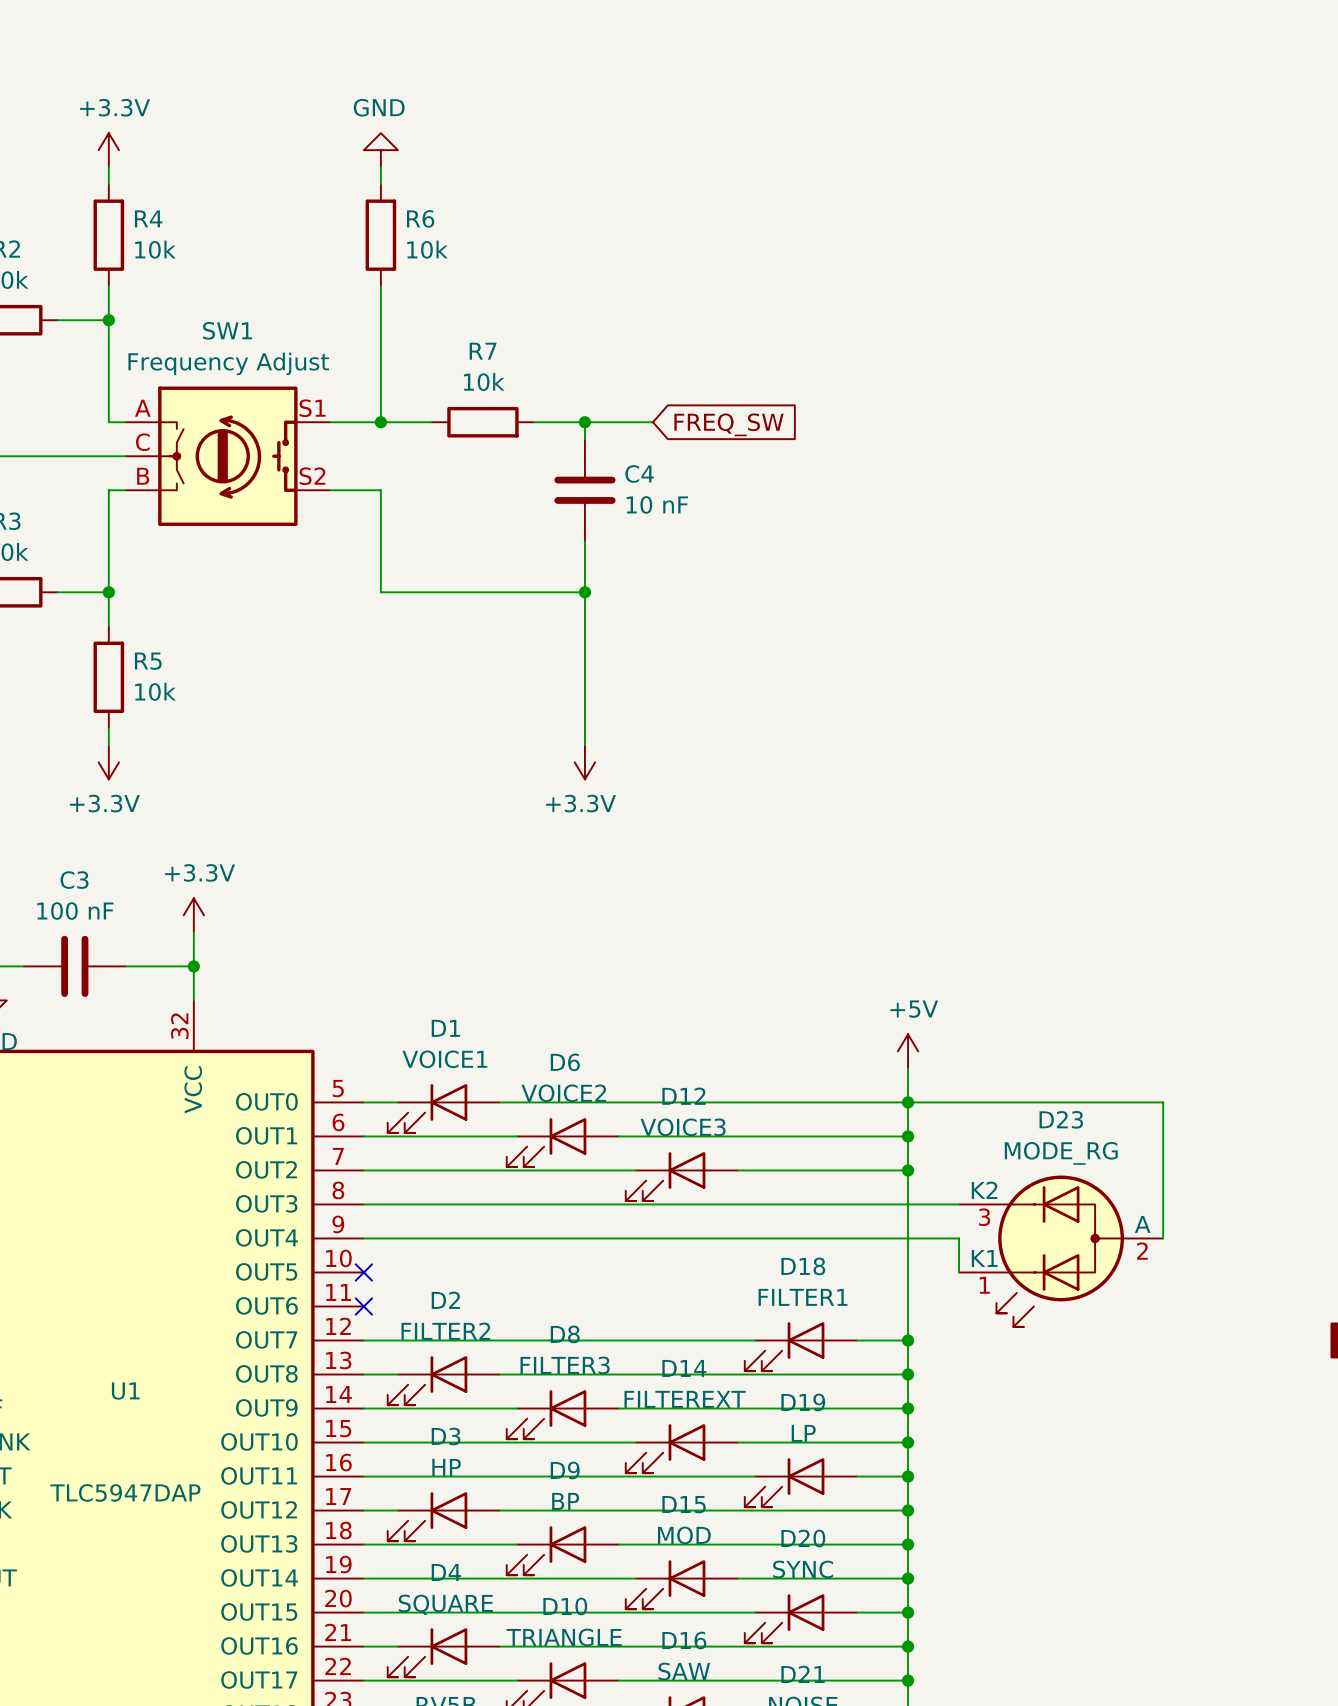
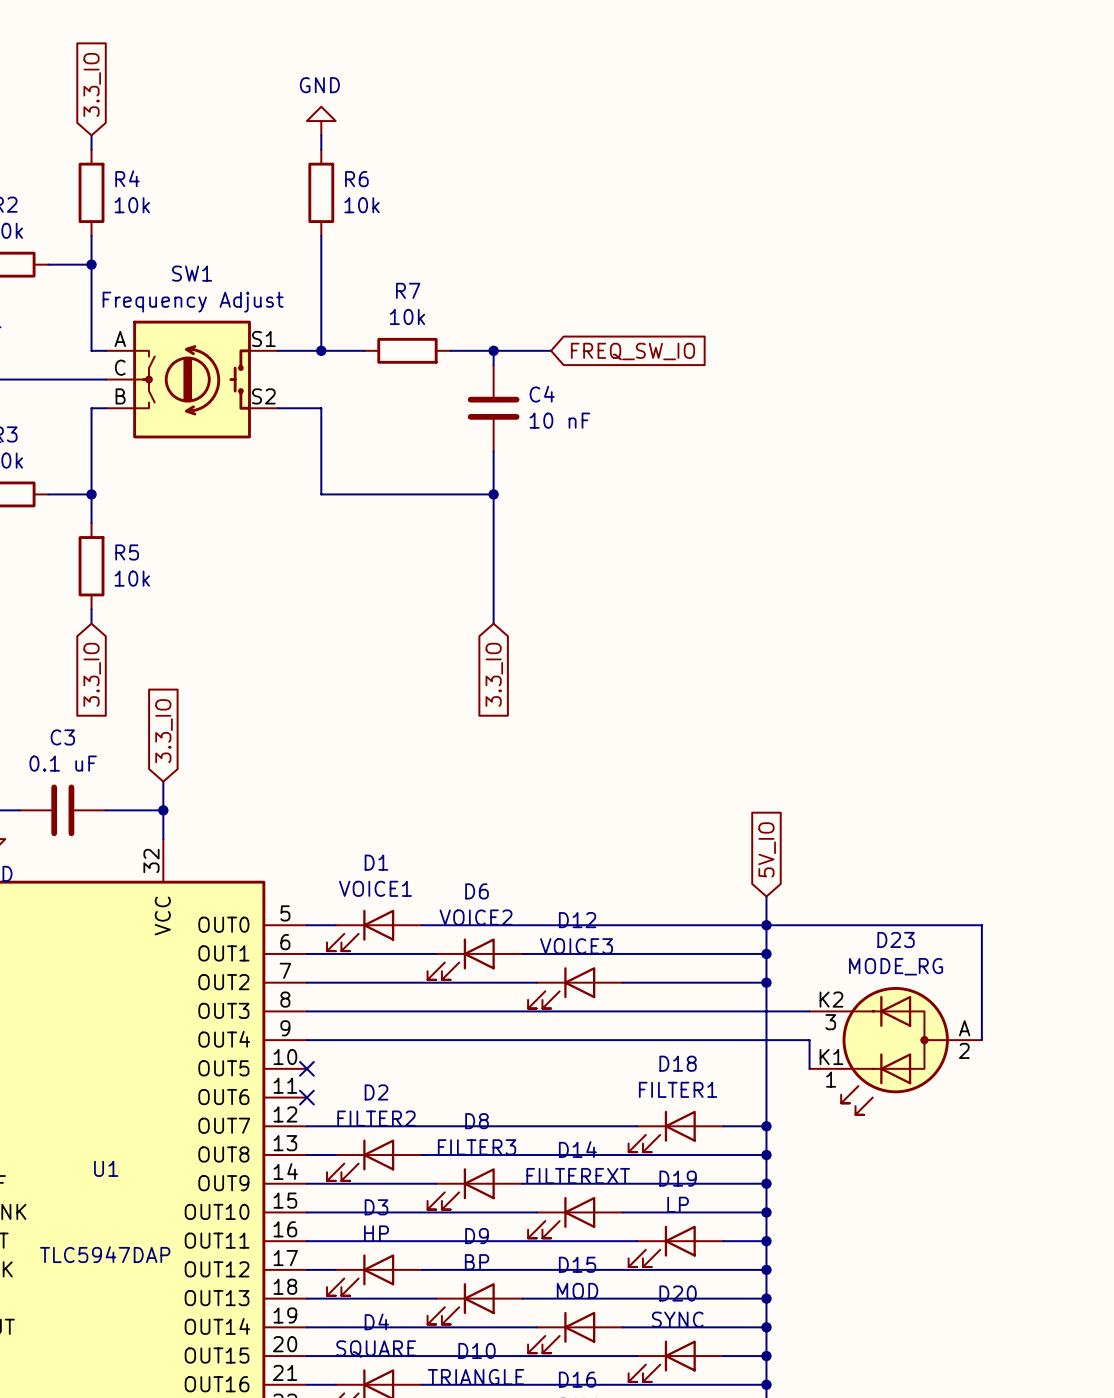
global label: none -> 3.3_IO (92, 84)
power symbol: +3.3V (108, 150) -> none
global label: FREQ_SW (728, 424) -> FREQ_SW_IO (632, 351)
power symbol: +3.3V (108, 762) -> none
power symbol: +3.3V (584, 762) -> none
global label: none -> 3.3_IO (92, 674)
global label: none -> 3.3_IO (494, 674)
global label: none -> 3.3_IO (164, 731)
C3 value: 100 nF (75, 911) -> 0.1 uF (63, 763)
power symbol: +3.3V (193, 915) -> none
global label: none -> 5V_IO (767, 849)
power symbol: +5V (908, 1051) -> none

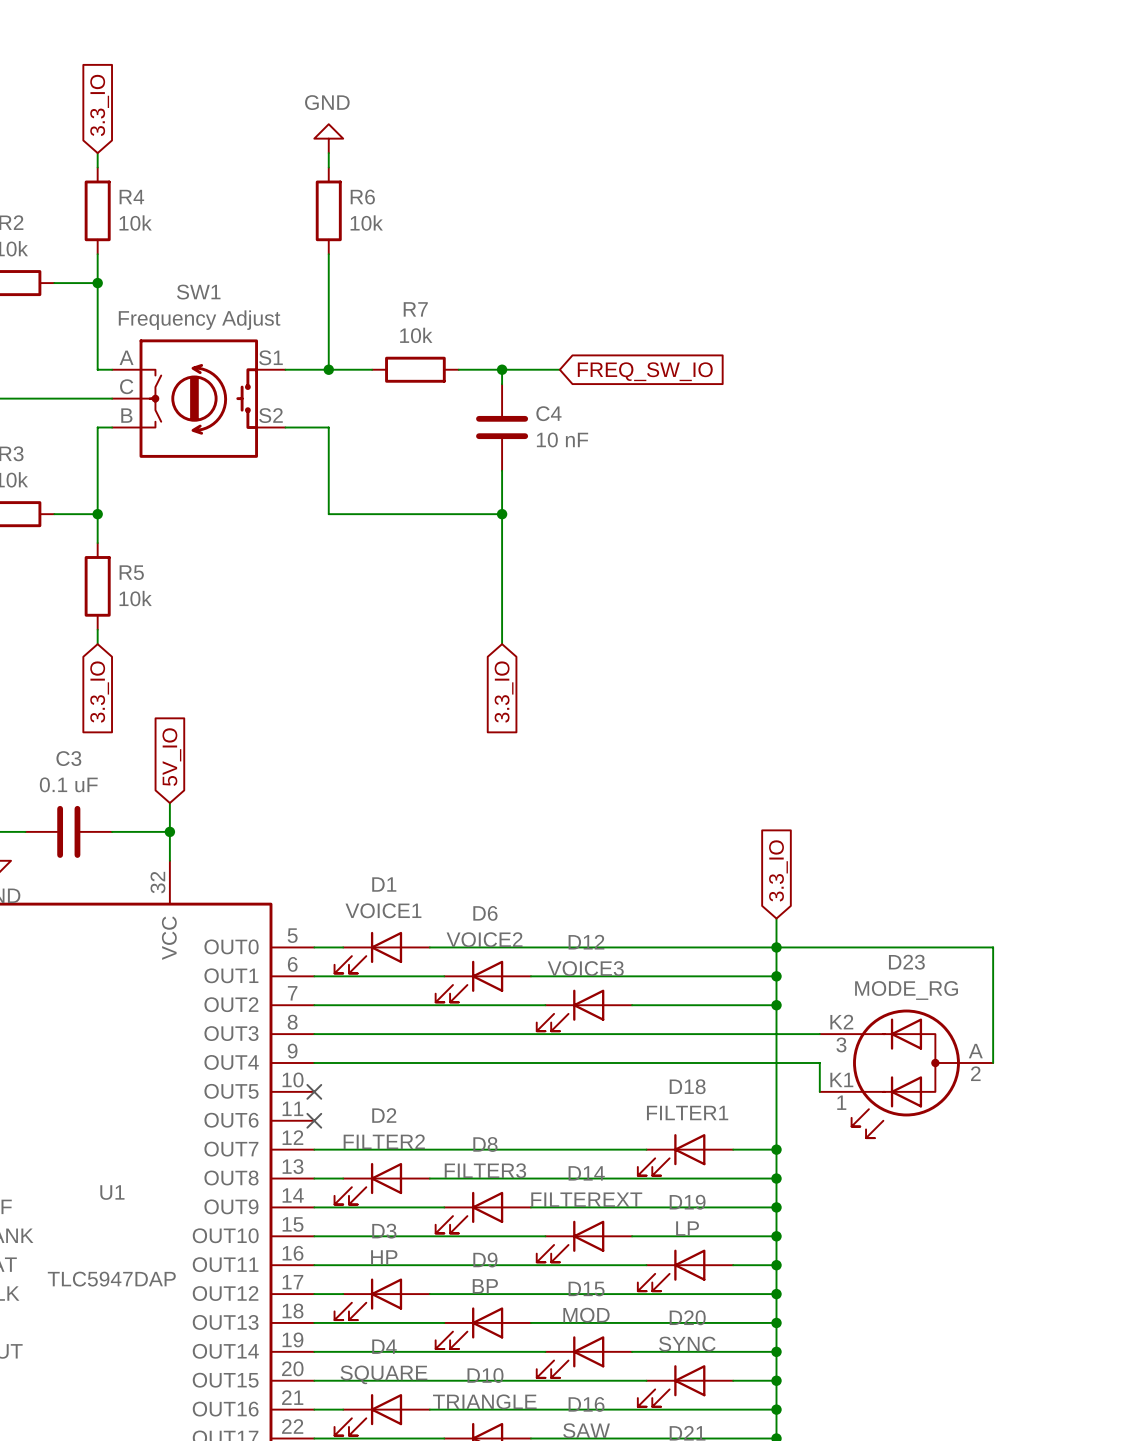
global label: 3.3_IO (164, 731) -> 5V_IO (171, 757)
global label: 5V_IO (767, 849) -> 3.3_IO (778, 870)

